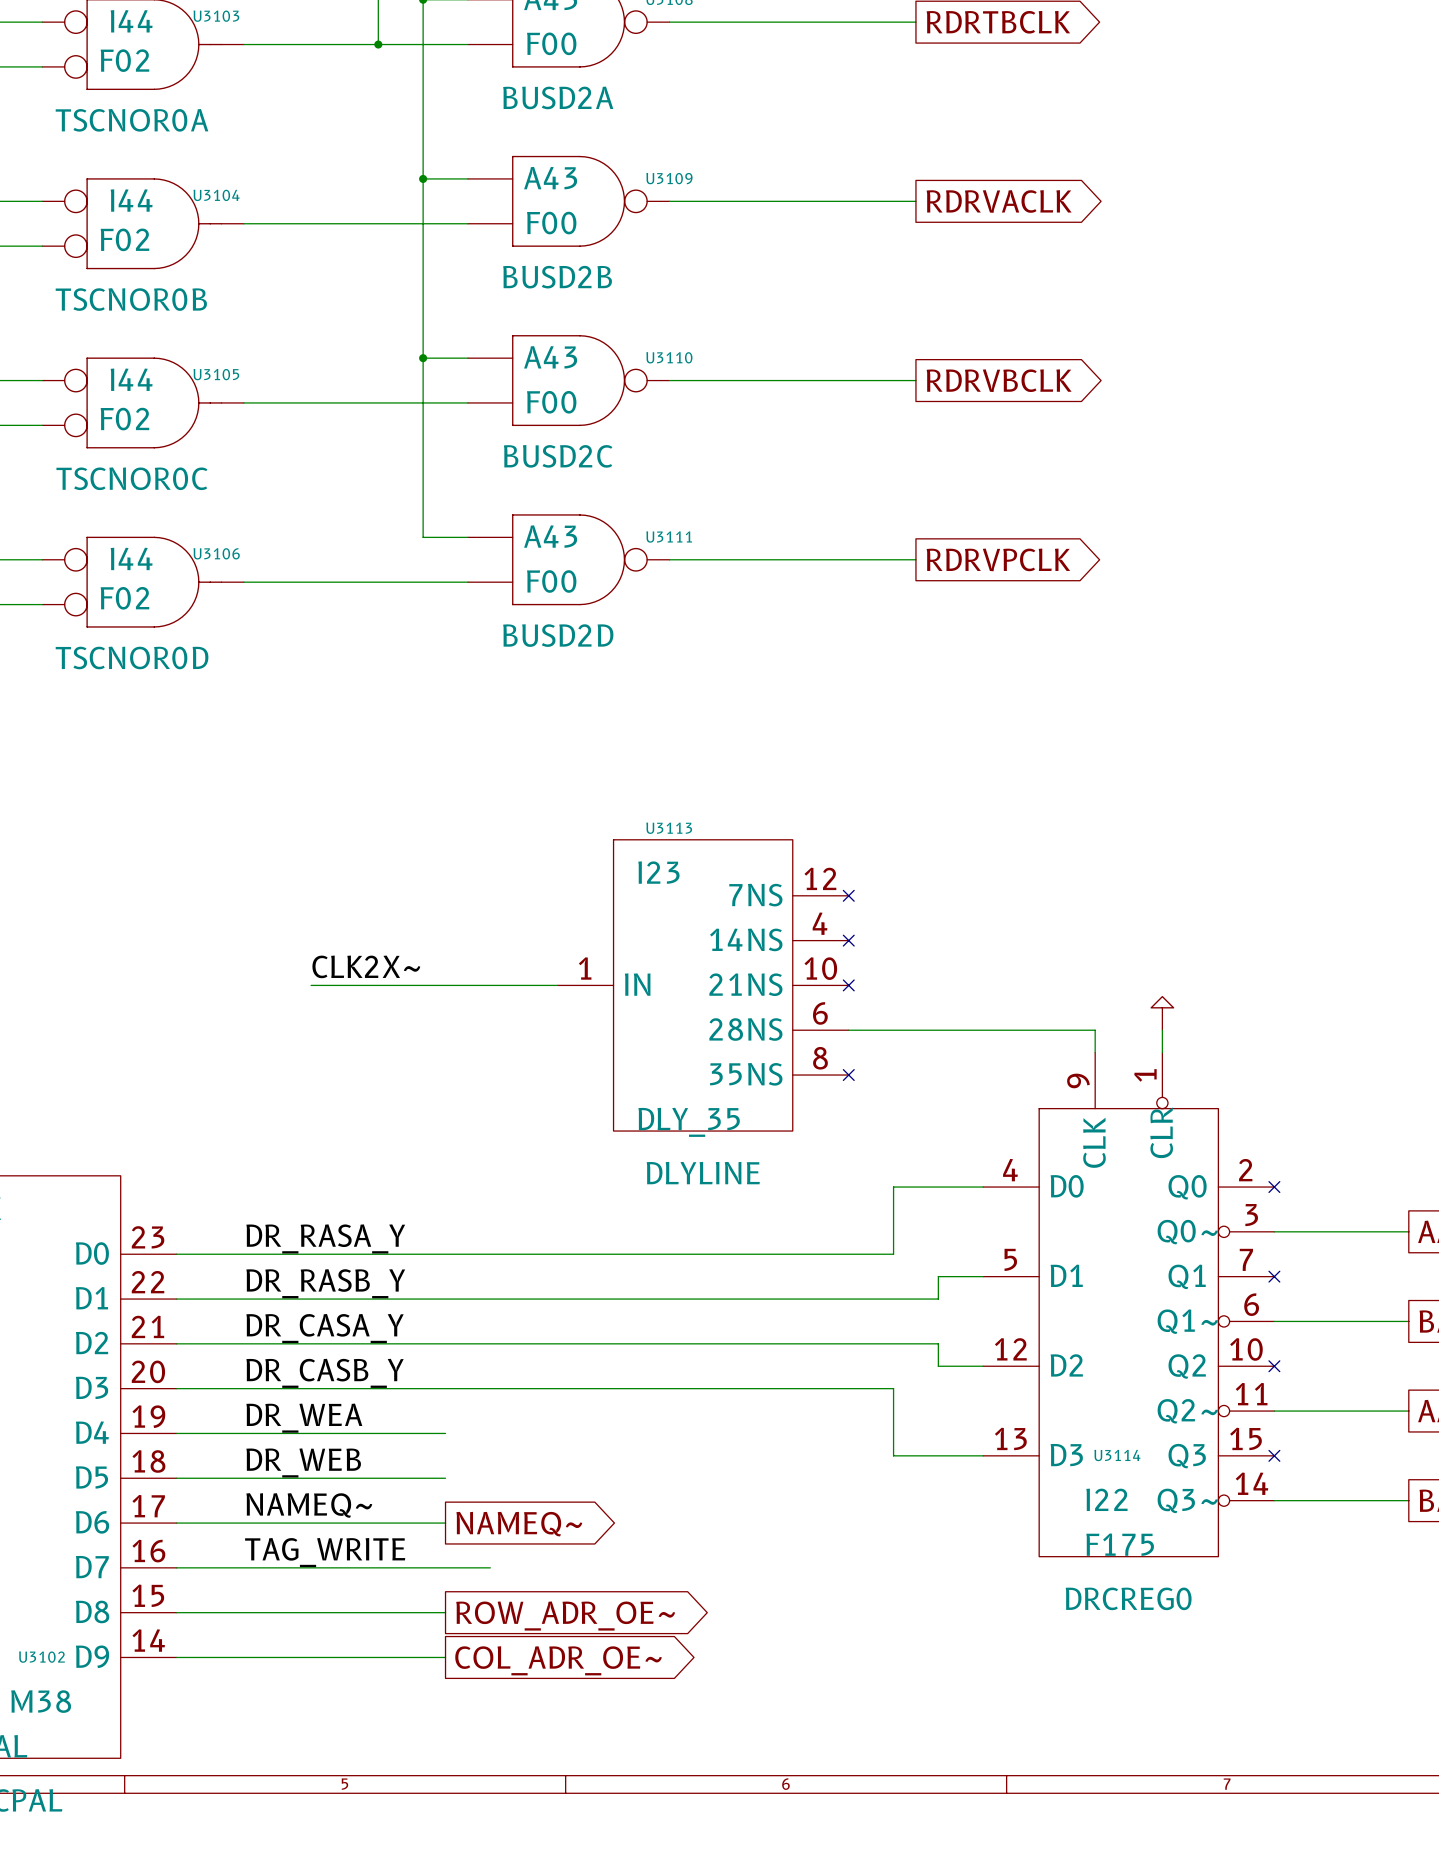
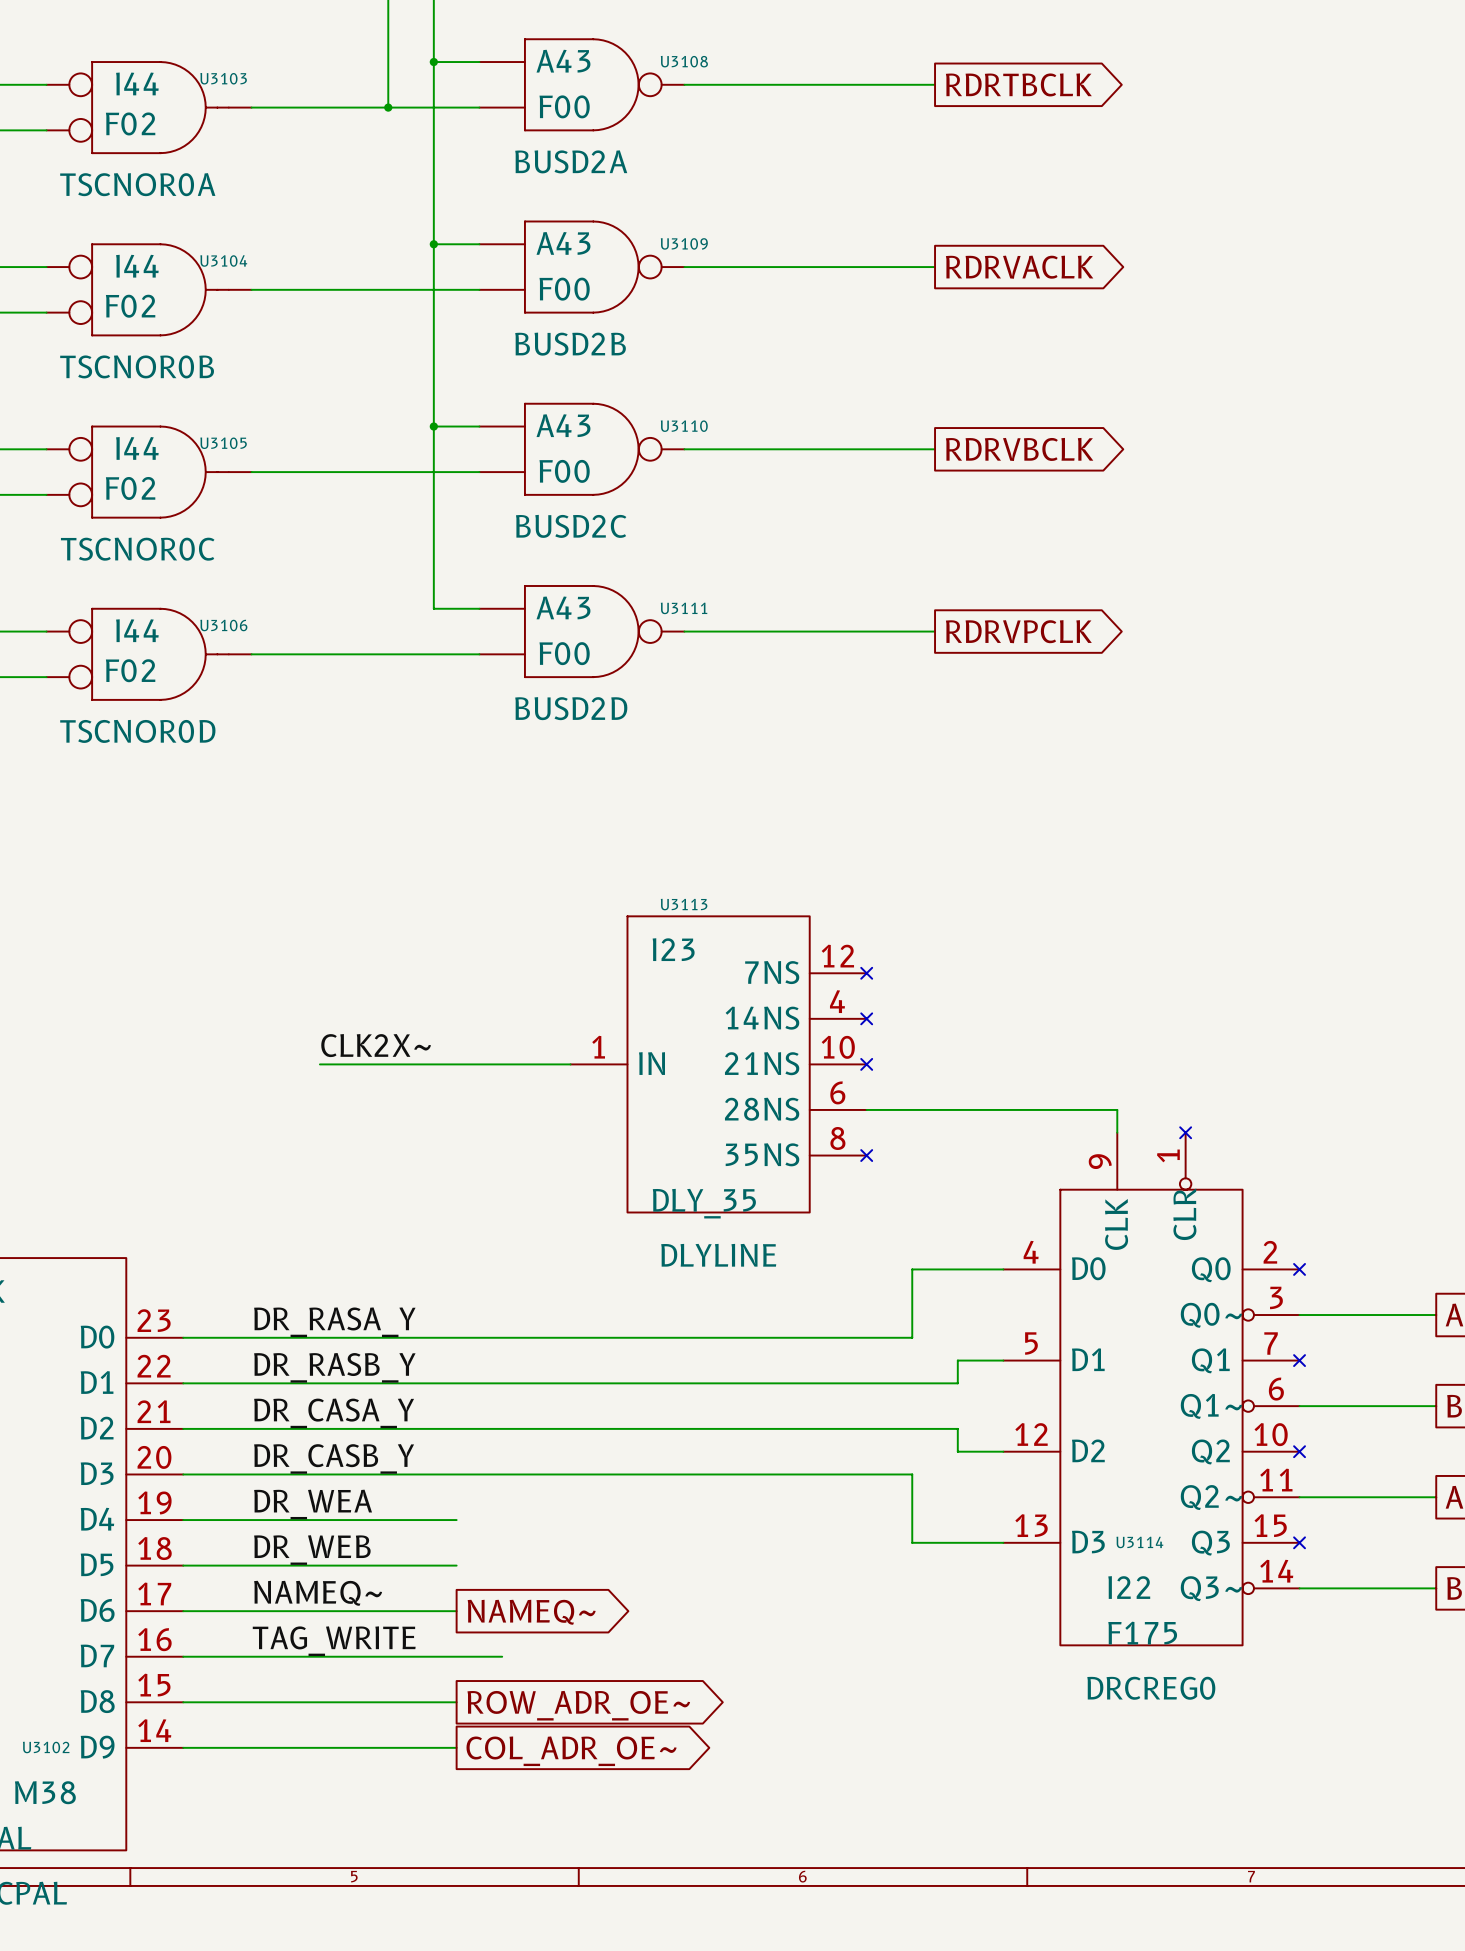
power symbol: (1162, 1013) -> none
wire: (1162, 1030) (1162, 1052) -> none
no-connect mark: none -> (1185, 1132)

